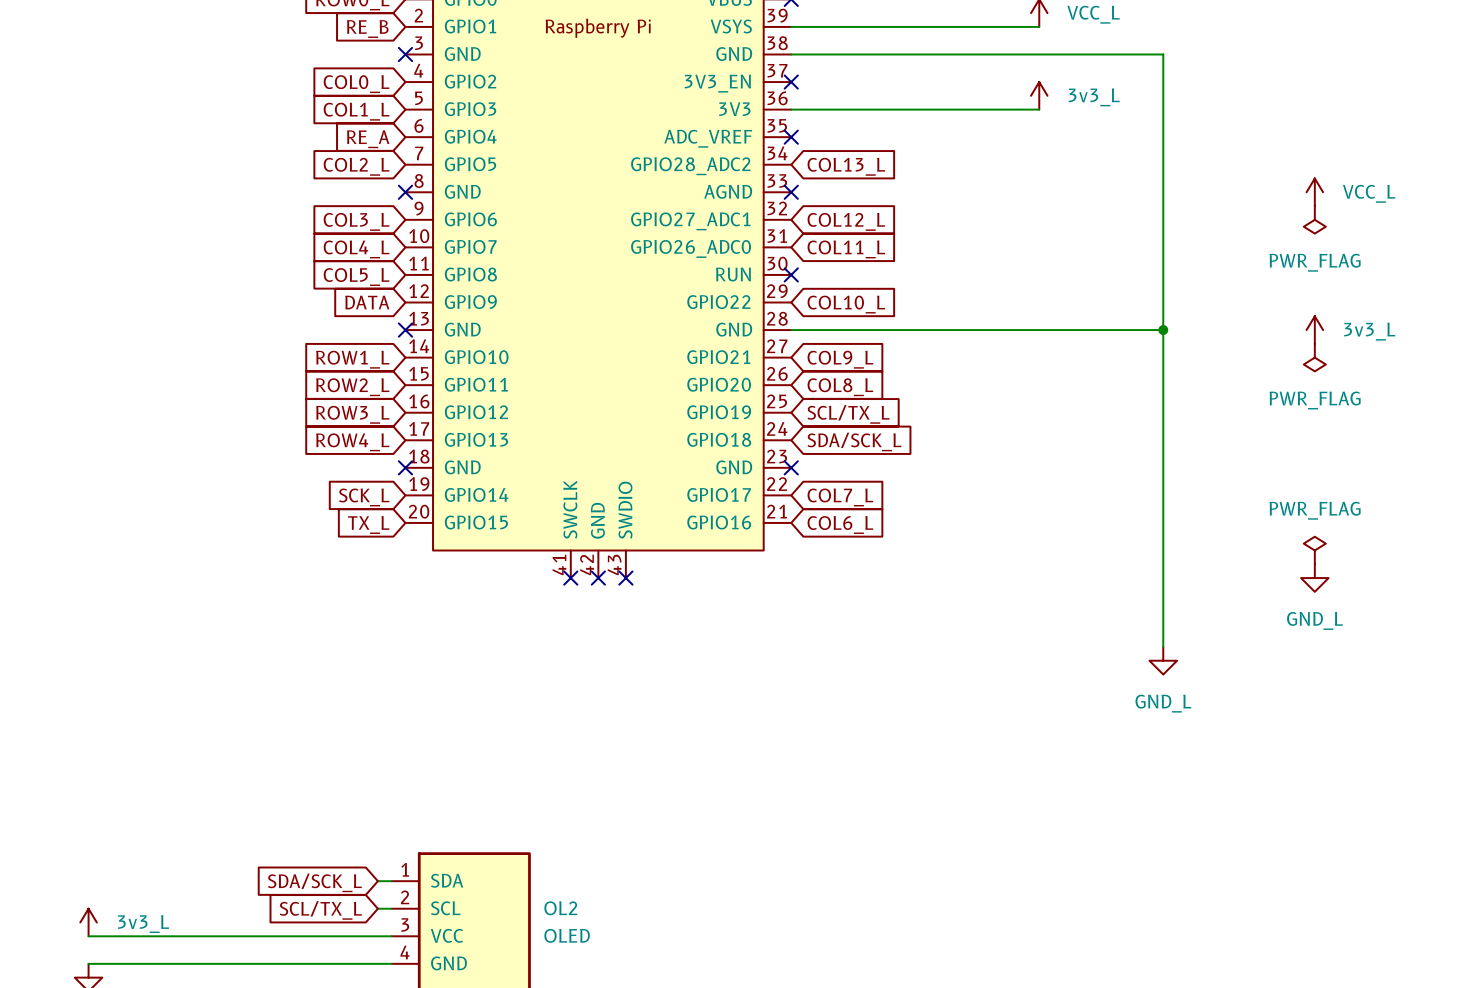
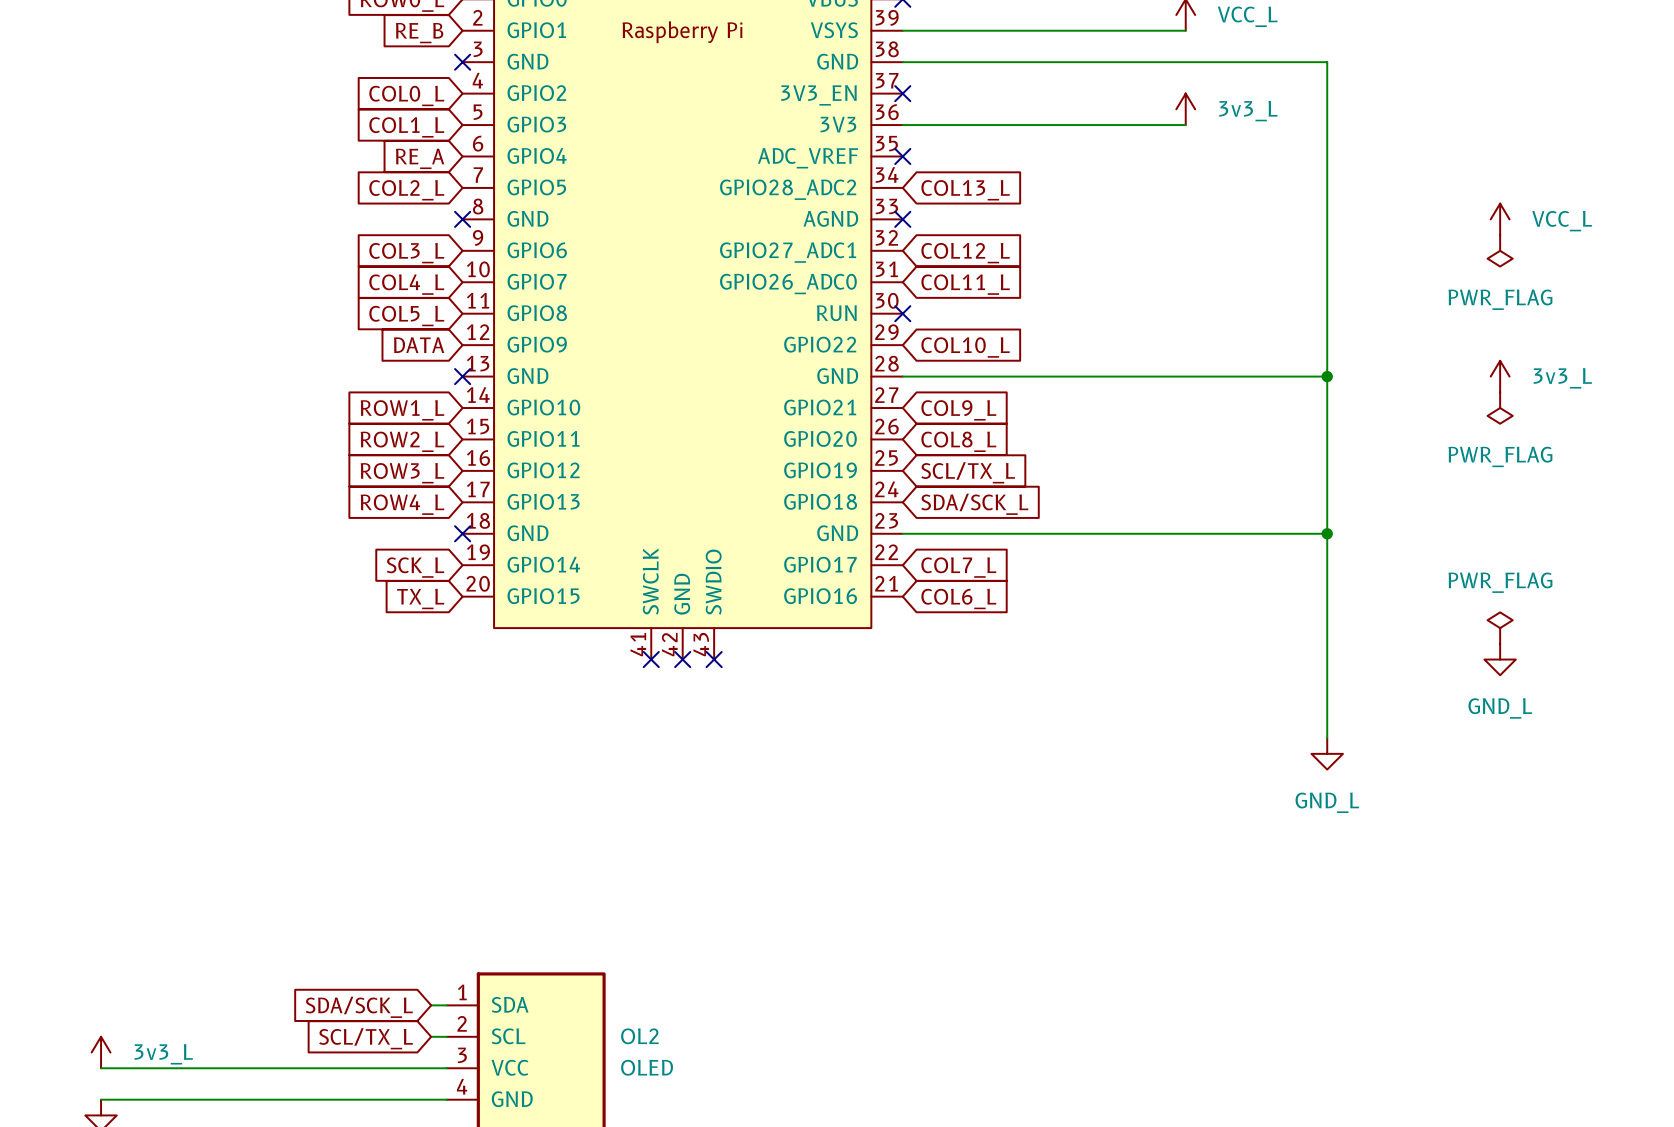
wire: none -> (902, 533) (1327, 533)
no-connect mark: (791, 467) -> none
junction: none -> (1327, 533)

